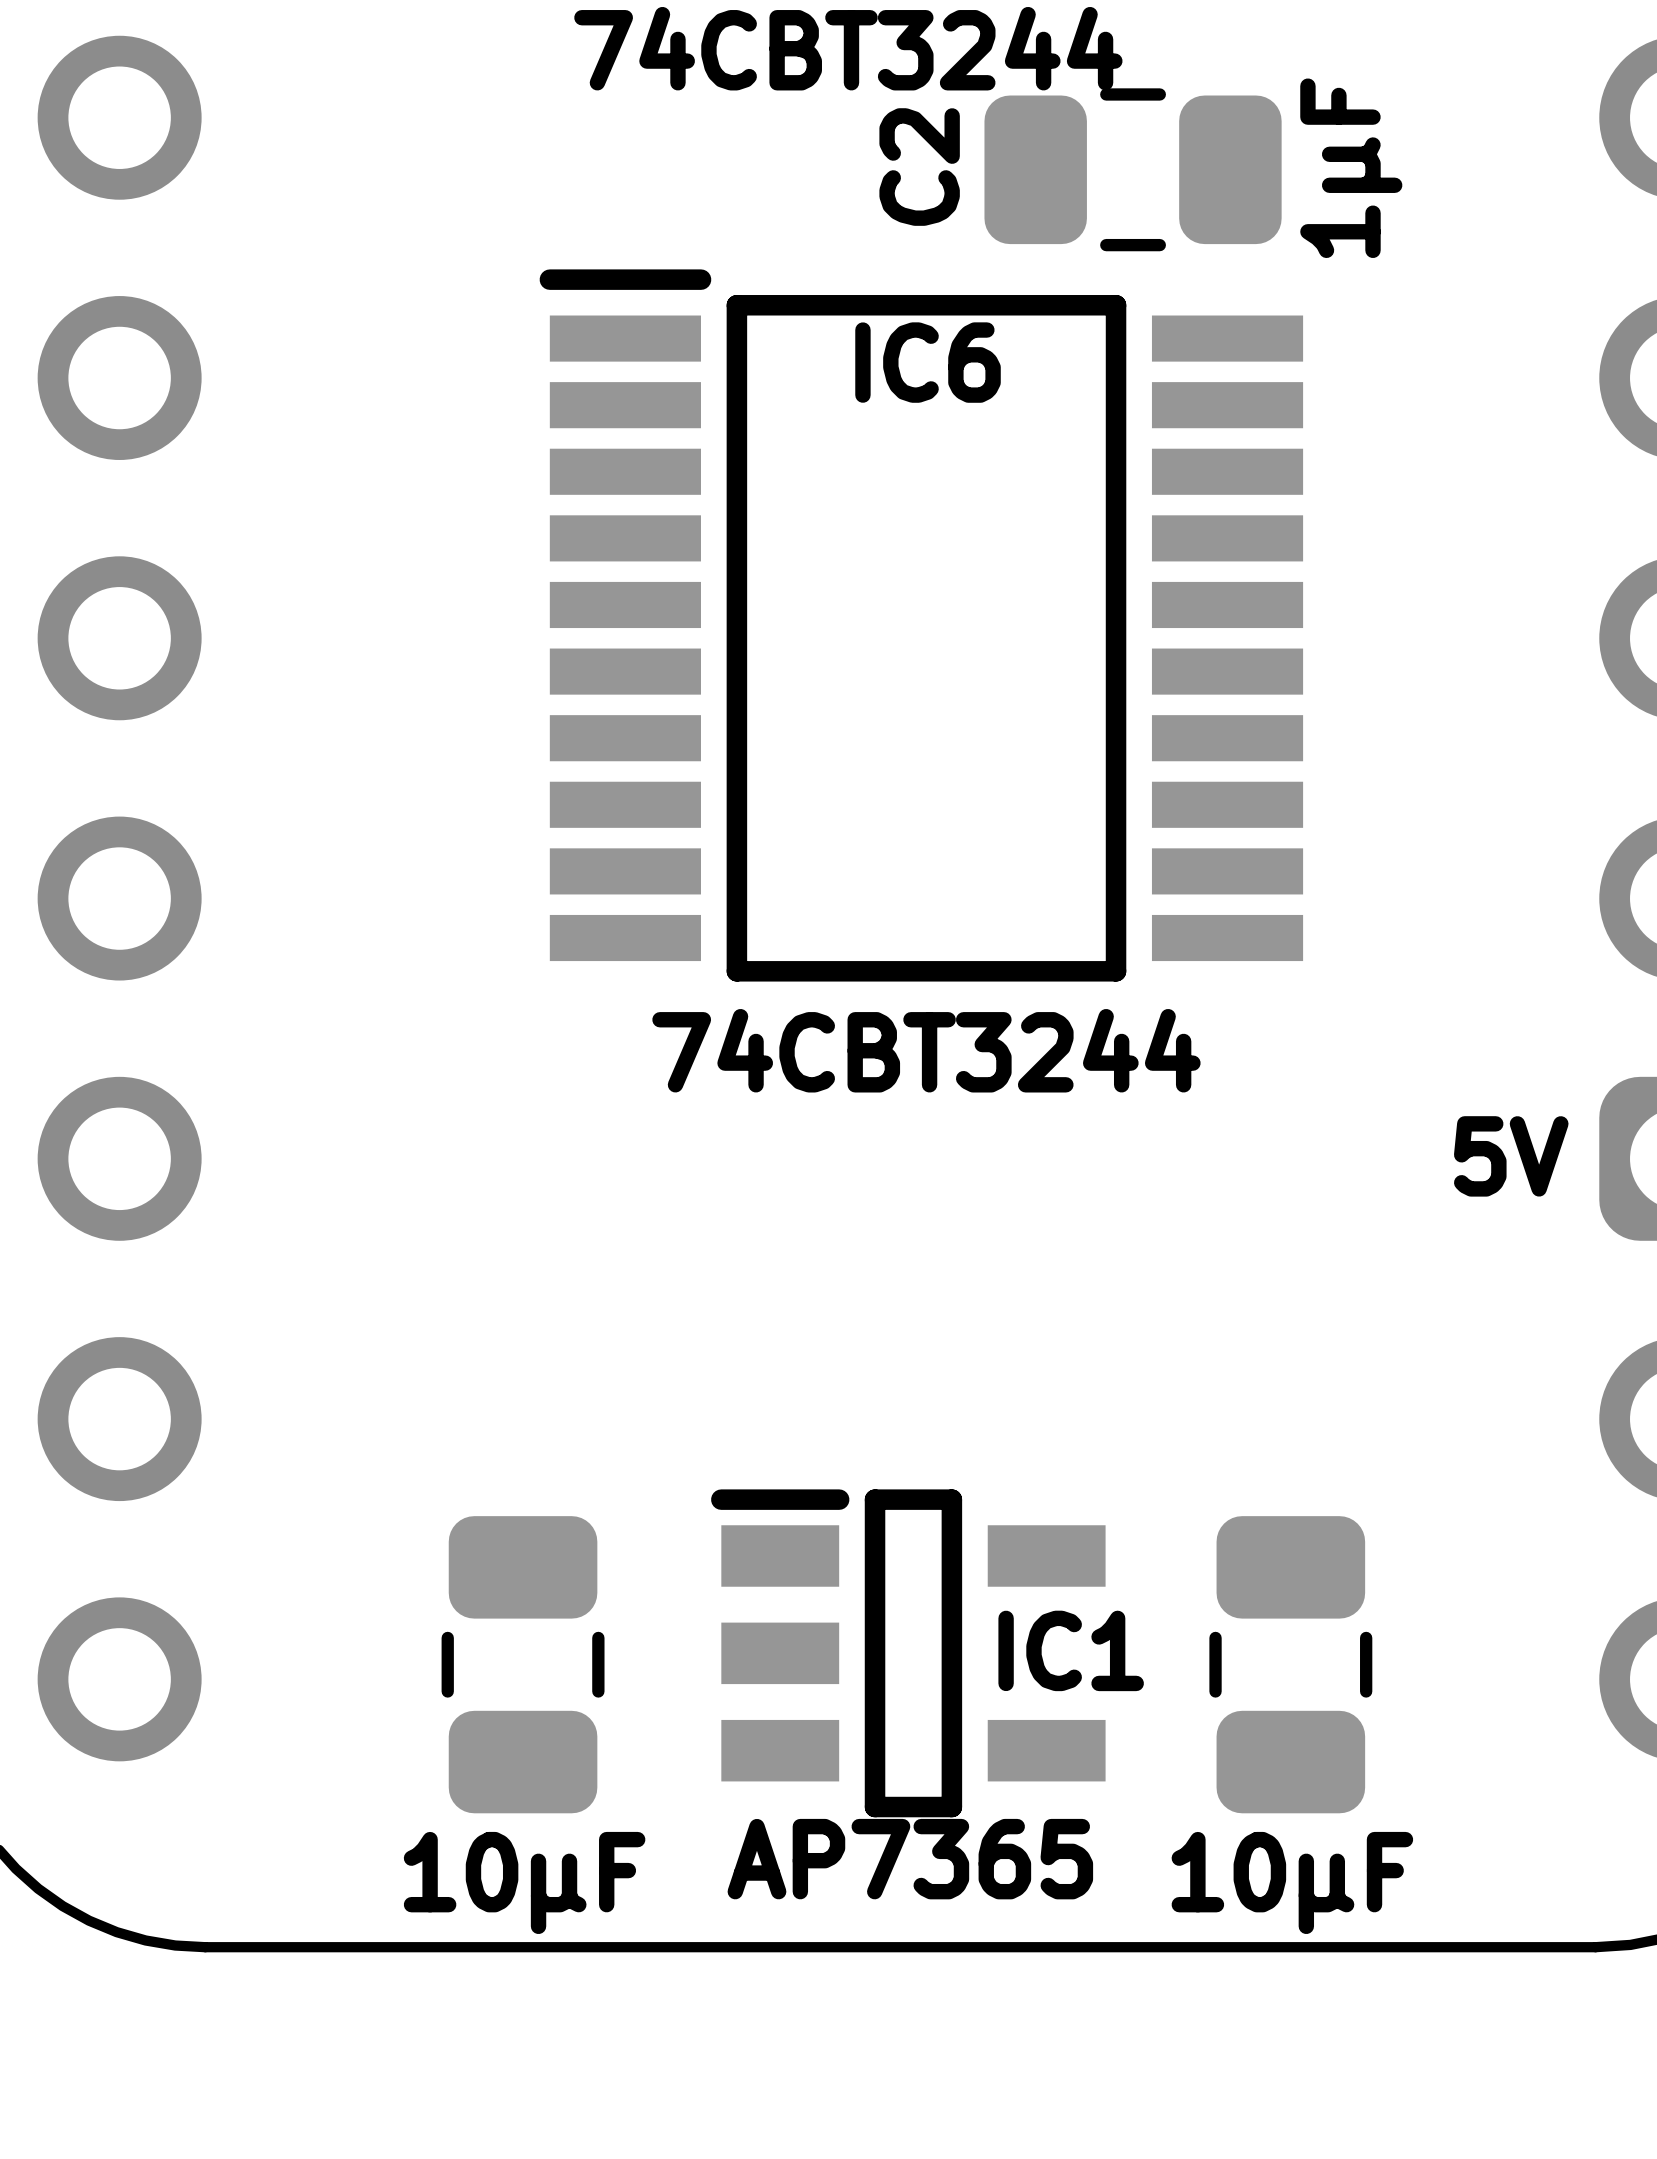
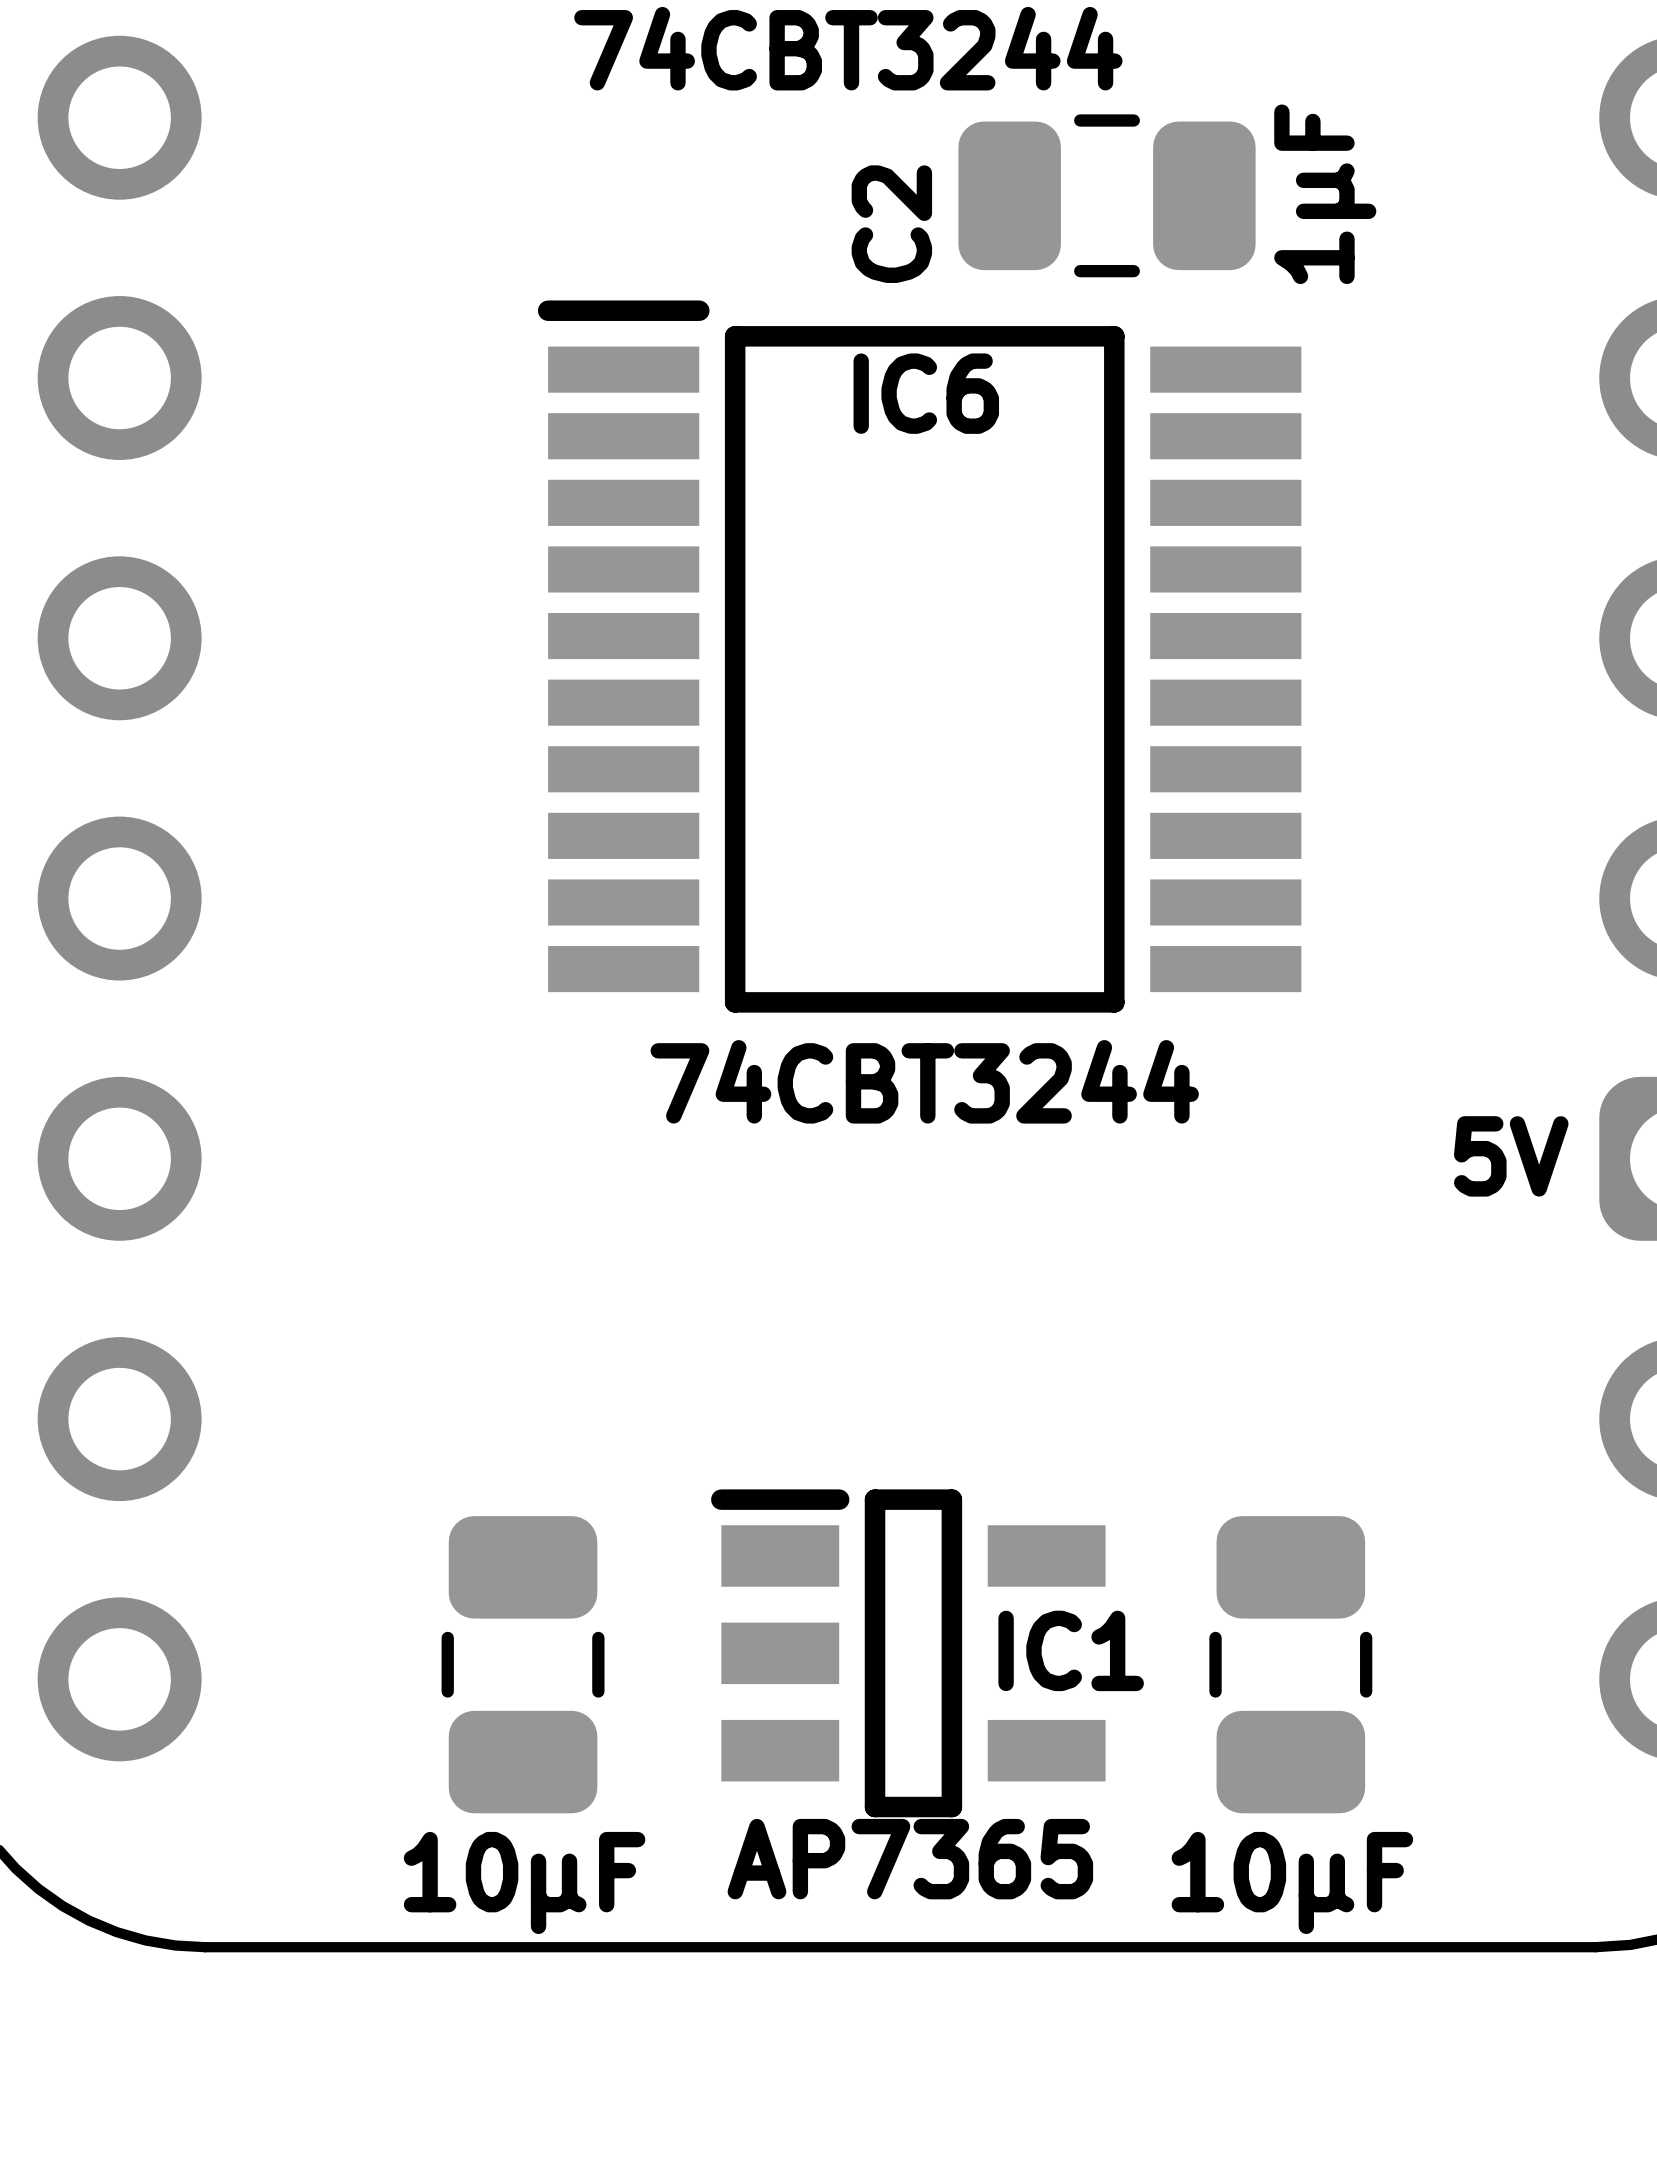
C2 name position: C2 (919, 167) -> C2 (891, 224)
C2 position: (1133, 169) -> (1107, 195)
IC6 position: (921, 625) -> (919, 656)

